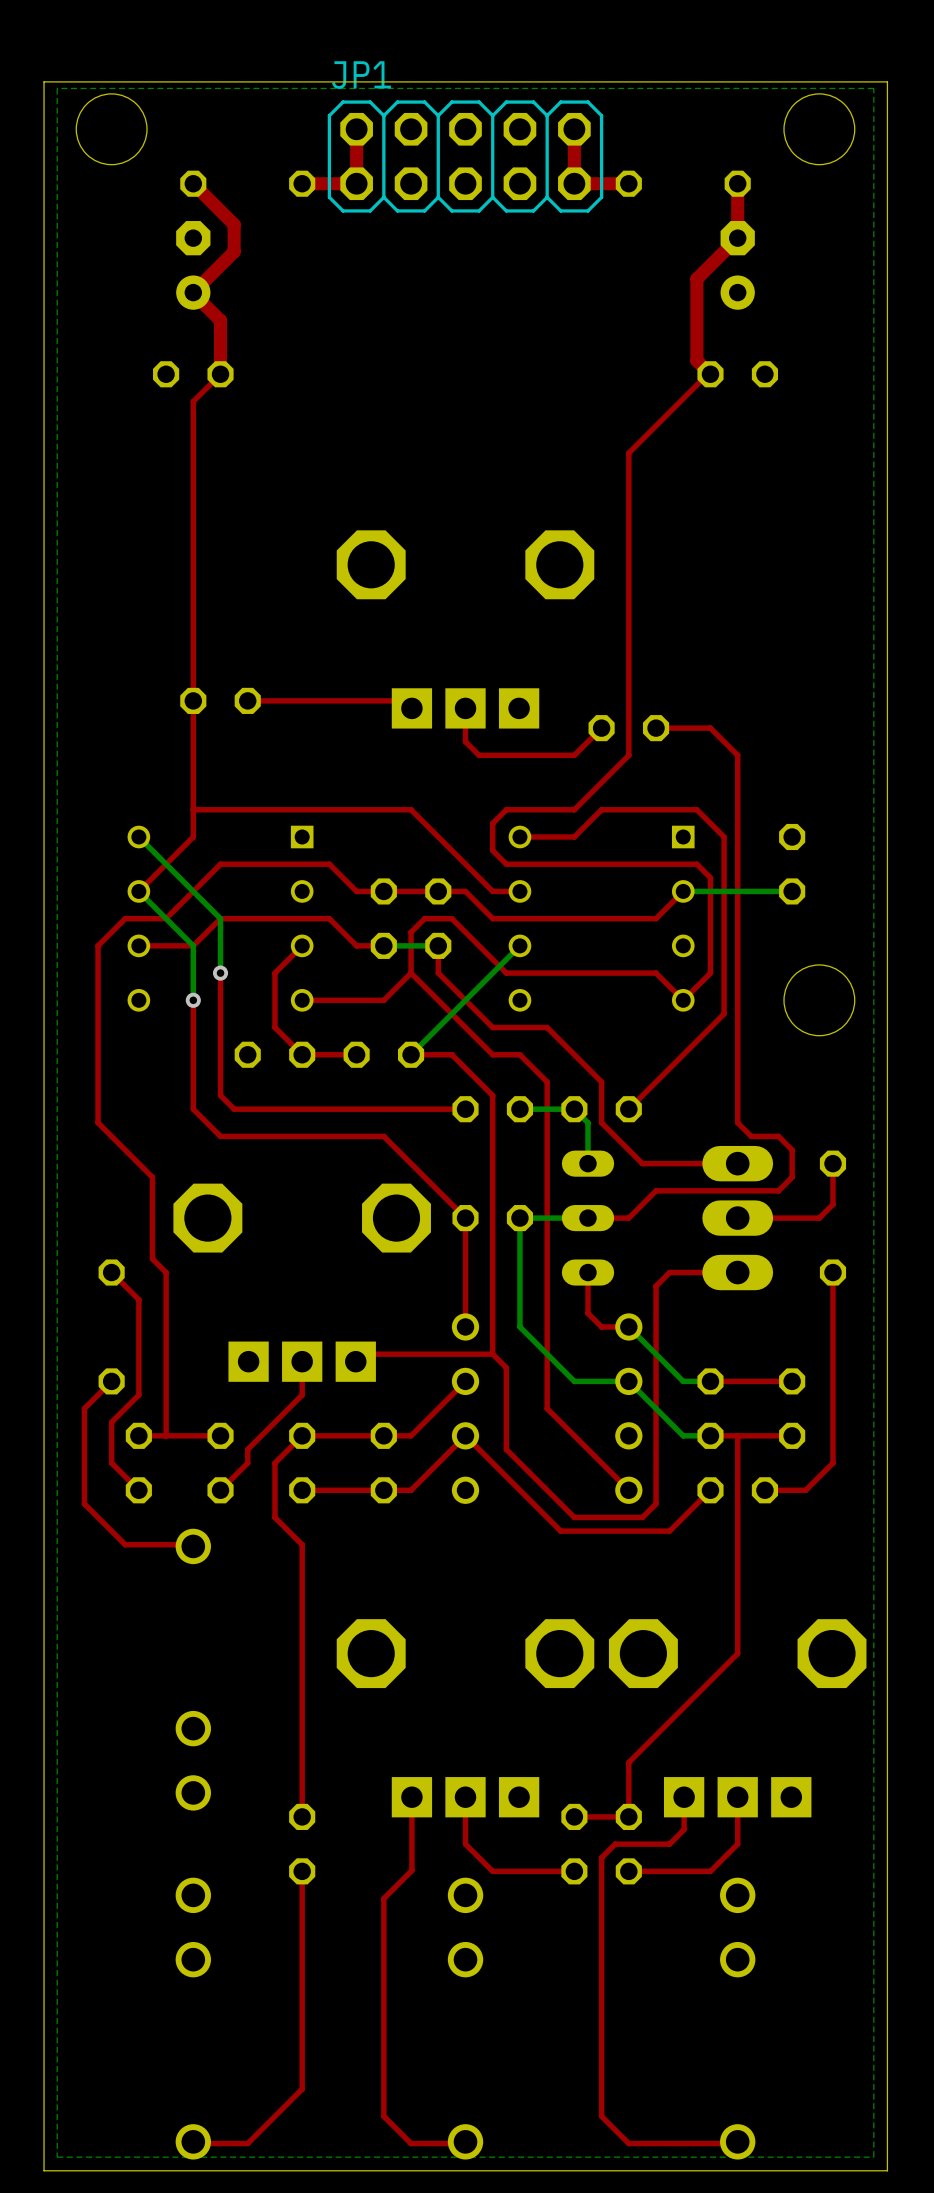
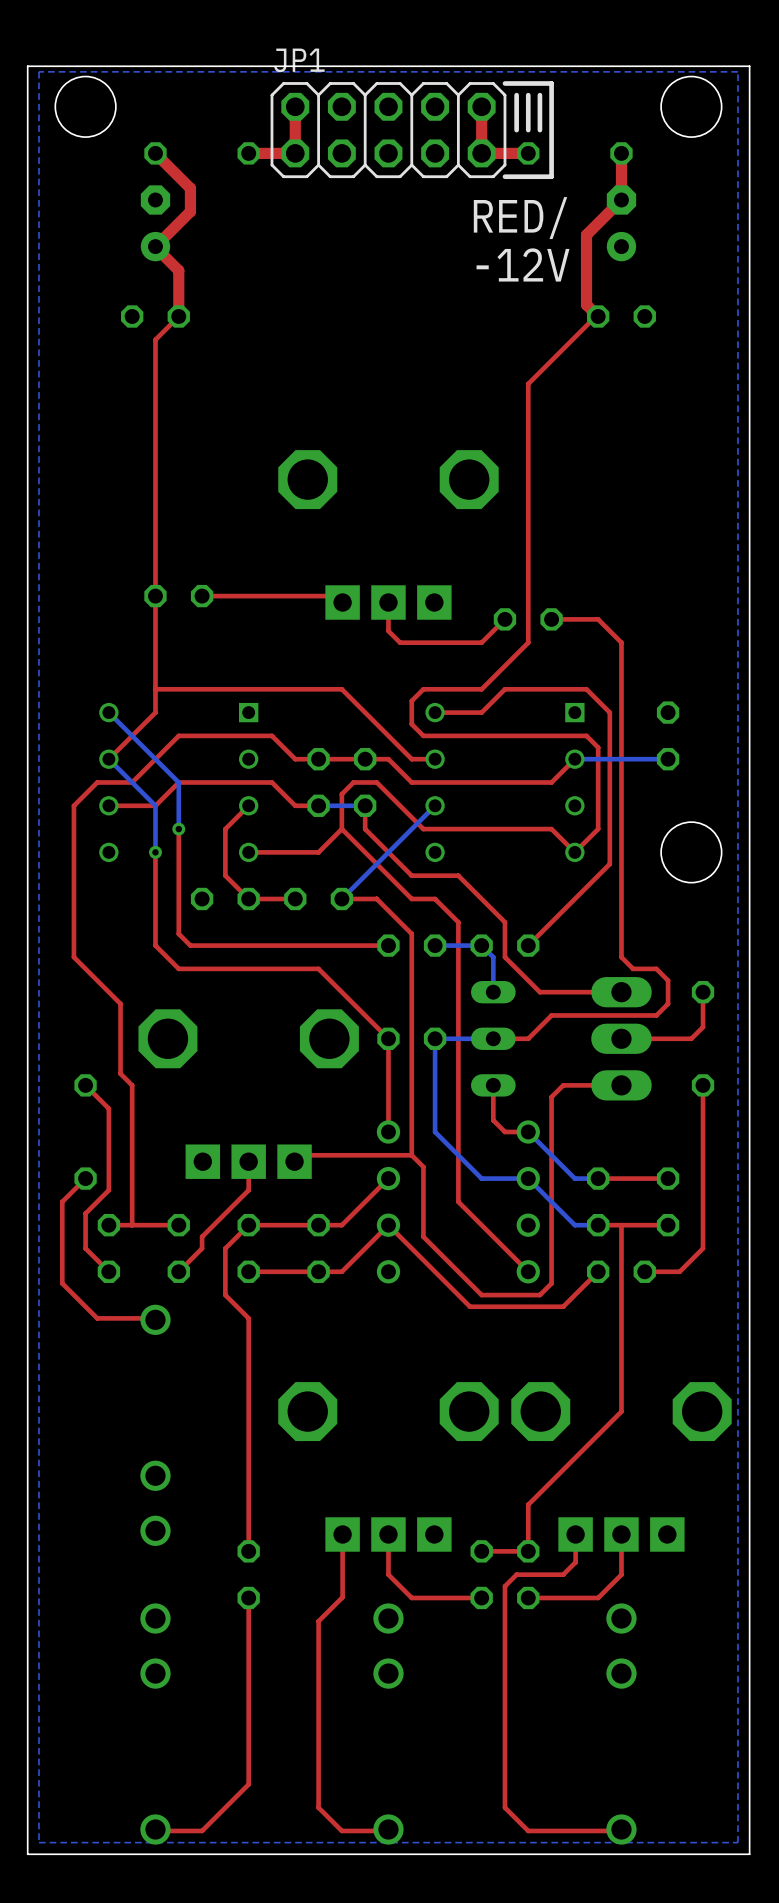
line: none -> (504, 83) (551, 83) (551, 176) (504, 176)
line: none -> (516, 95) (516, 130)
line: none -> (528, 95) (528, 130)
line: none -> (539, 95) (539, 130)
text: none -> RED/ (520, 218)
text: none -> -12V (523, 264)

